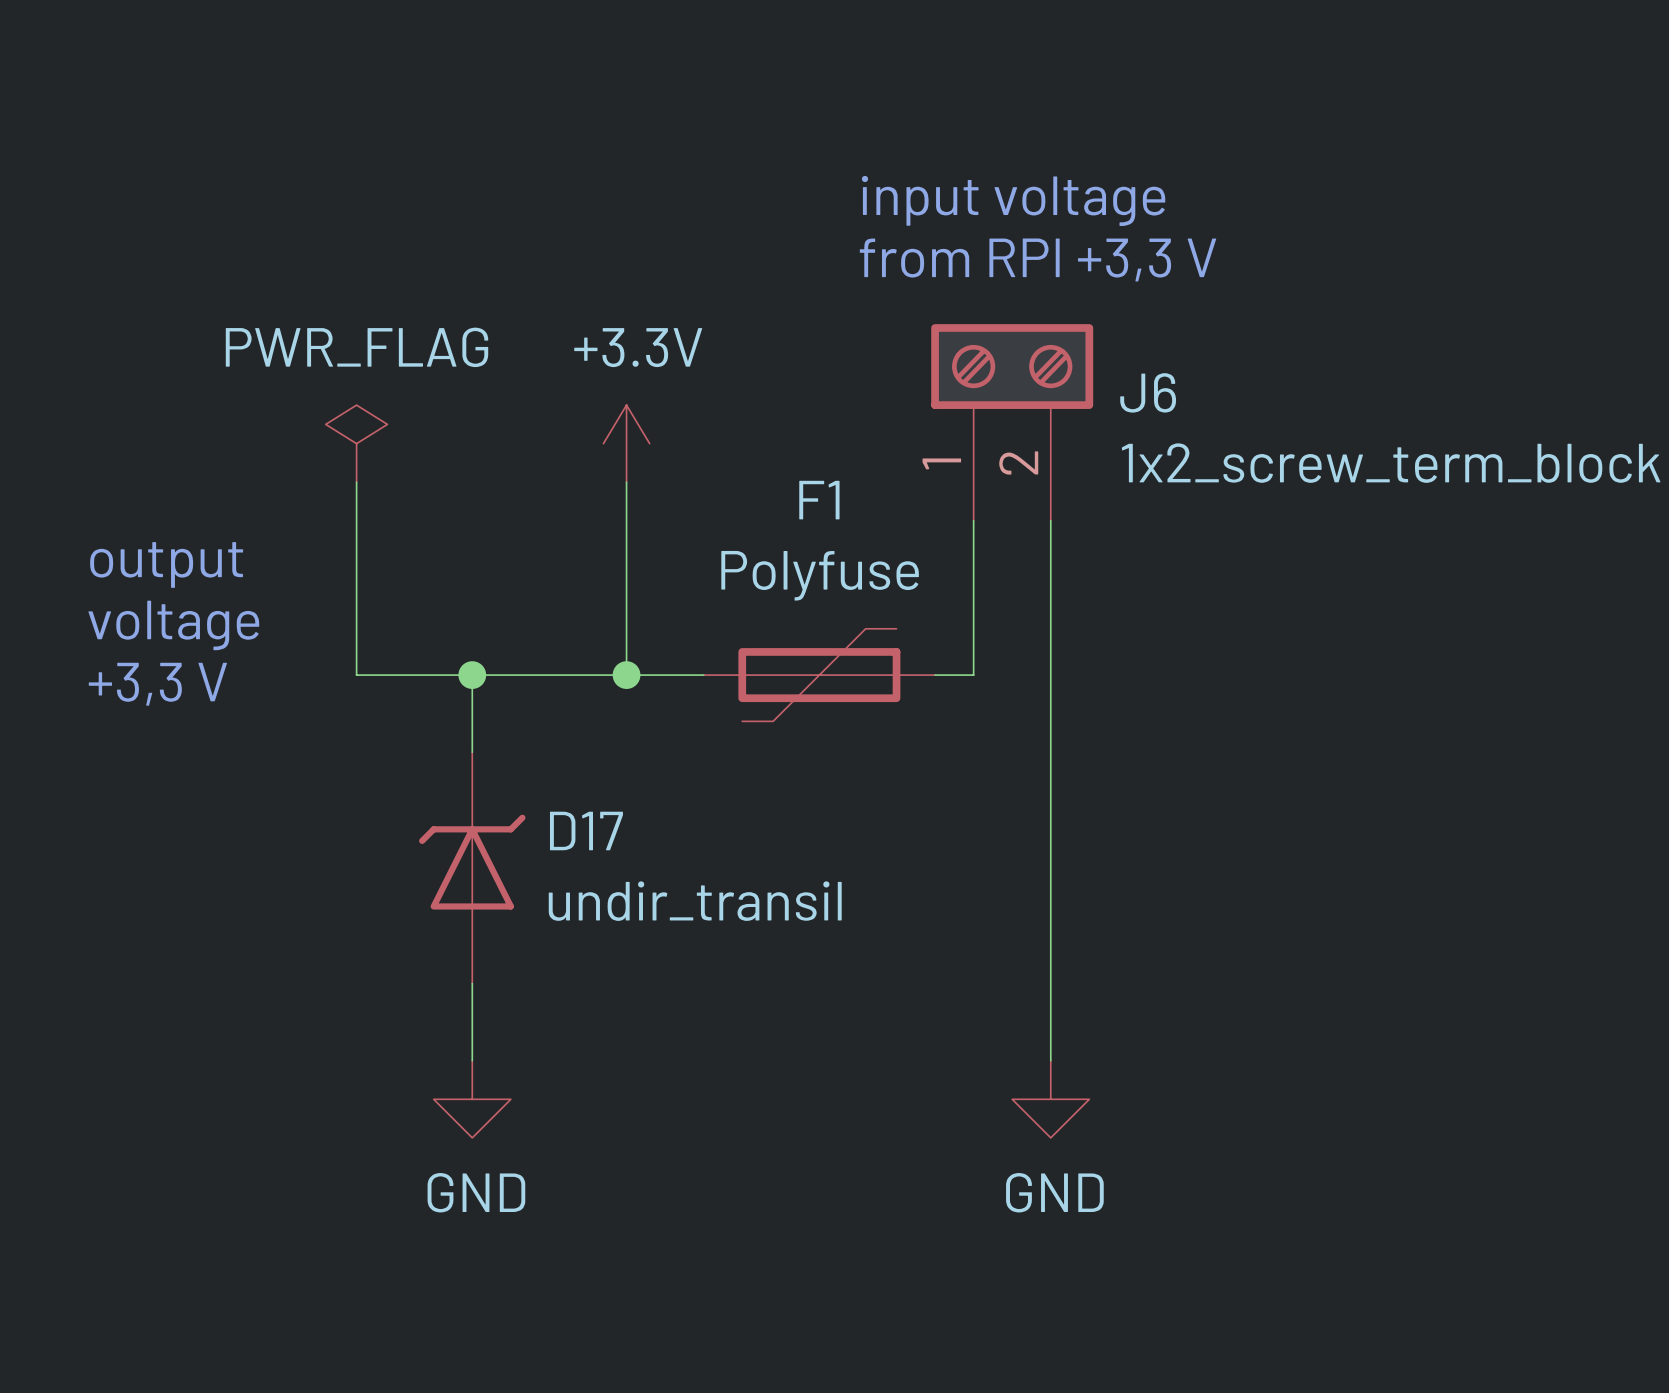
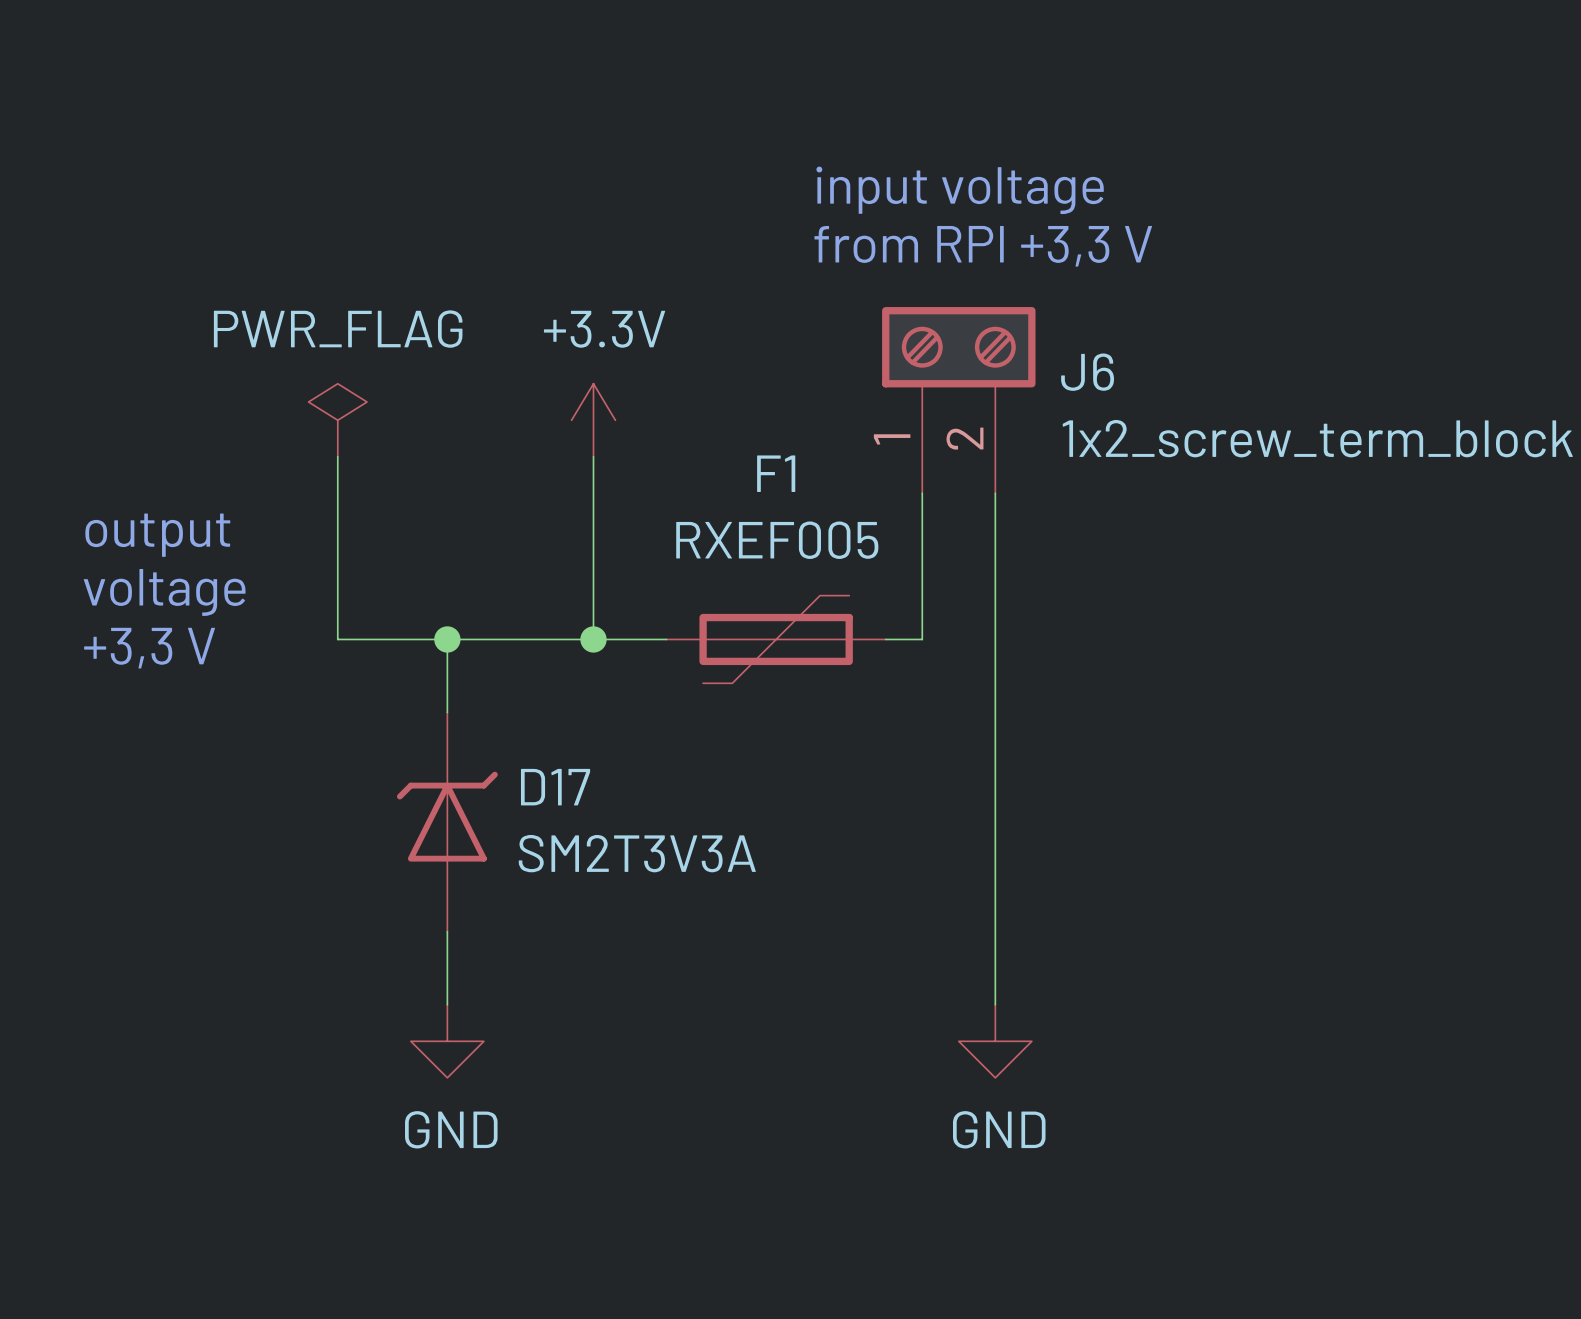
F1 value: Polyfuse (820, 575) -> RXEF005 (777, 540)
D17 value: undir_transil (695, 901) -> SM2T3V3A (637, 853)

